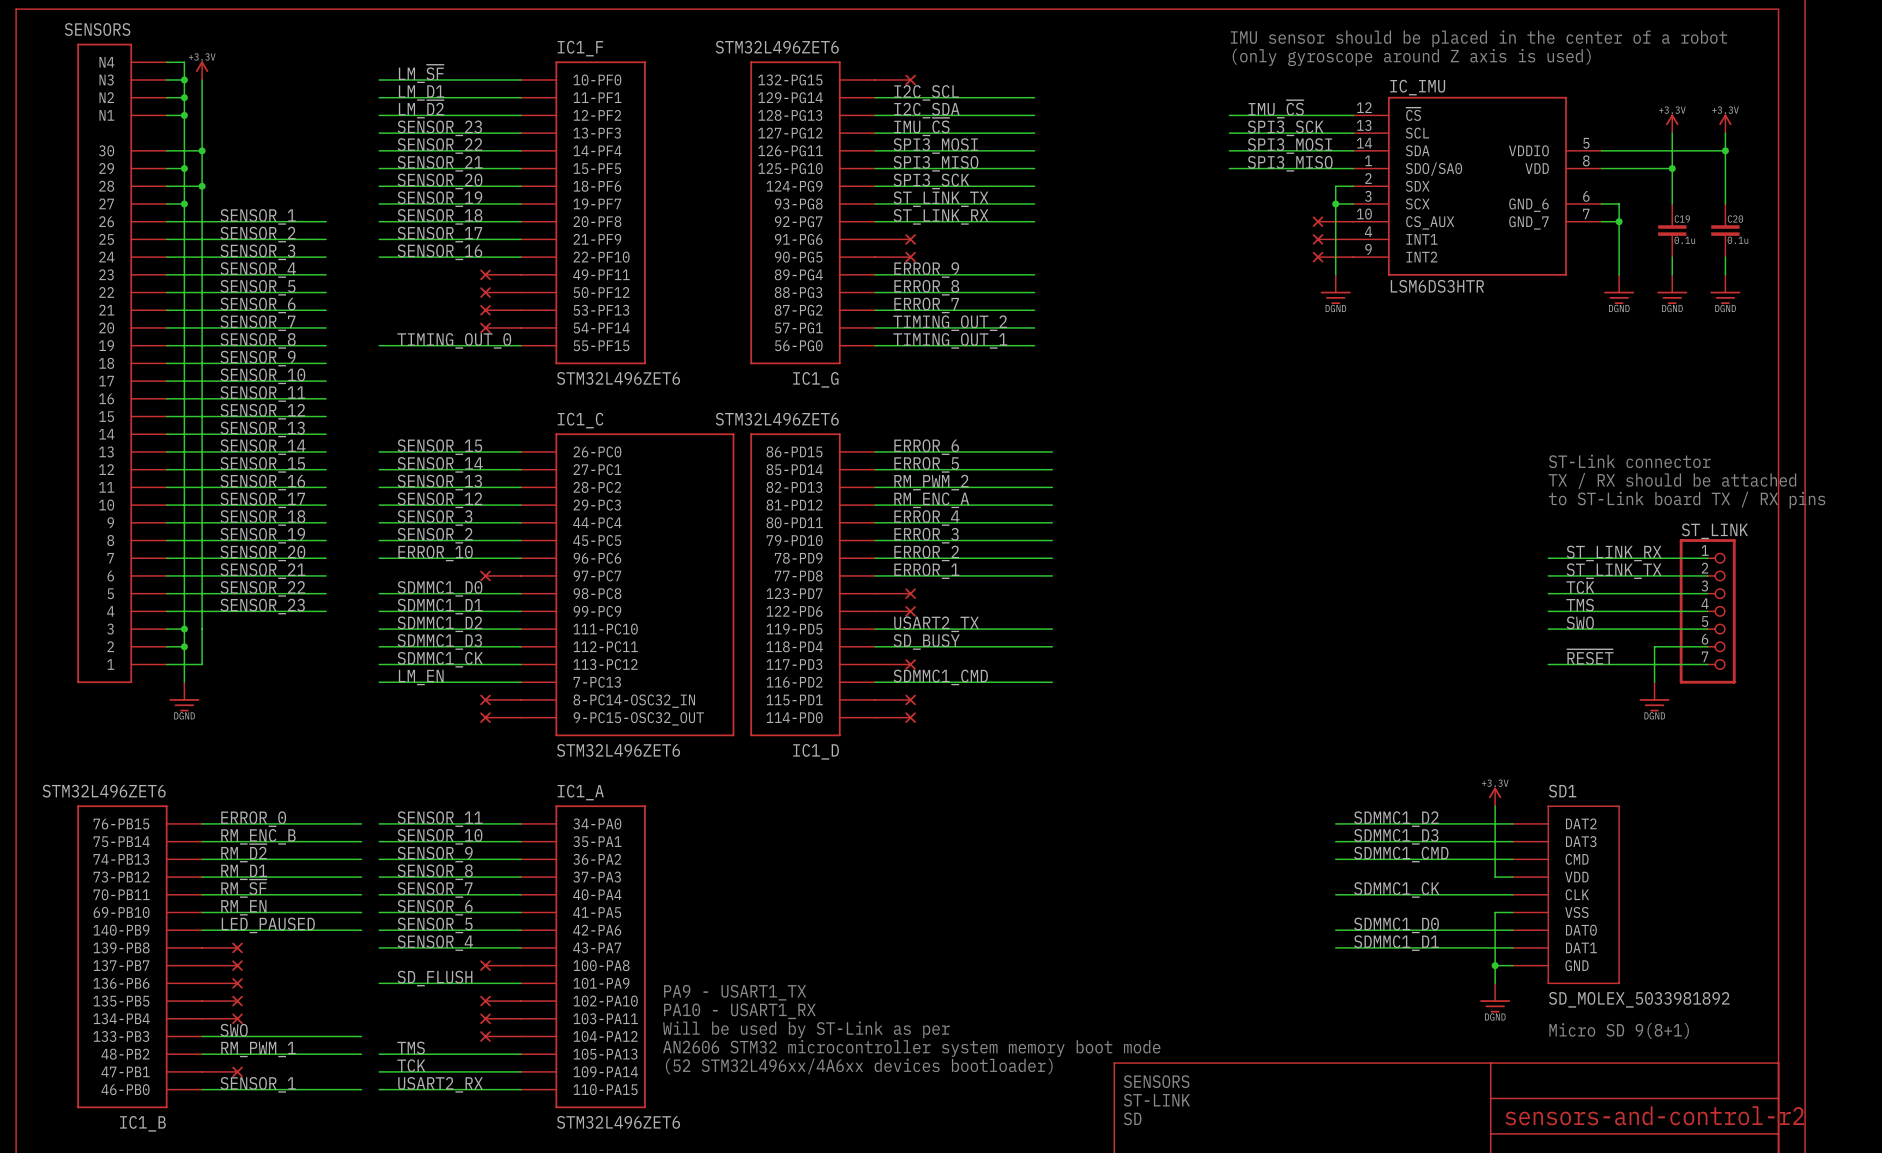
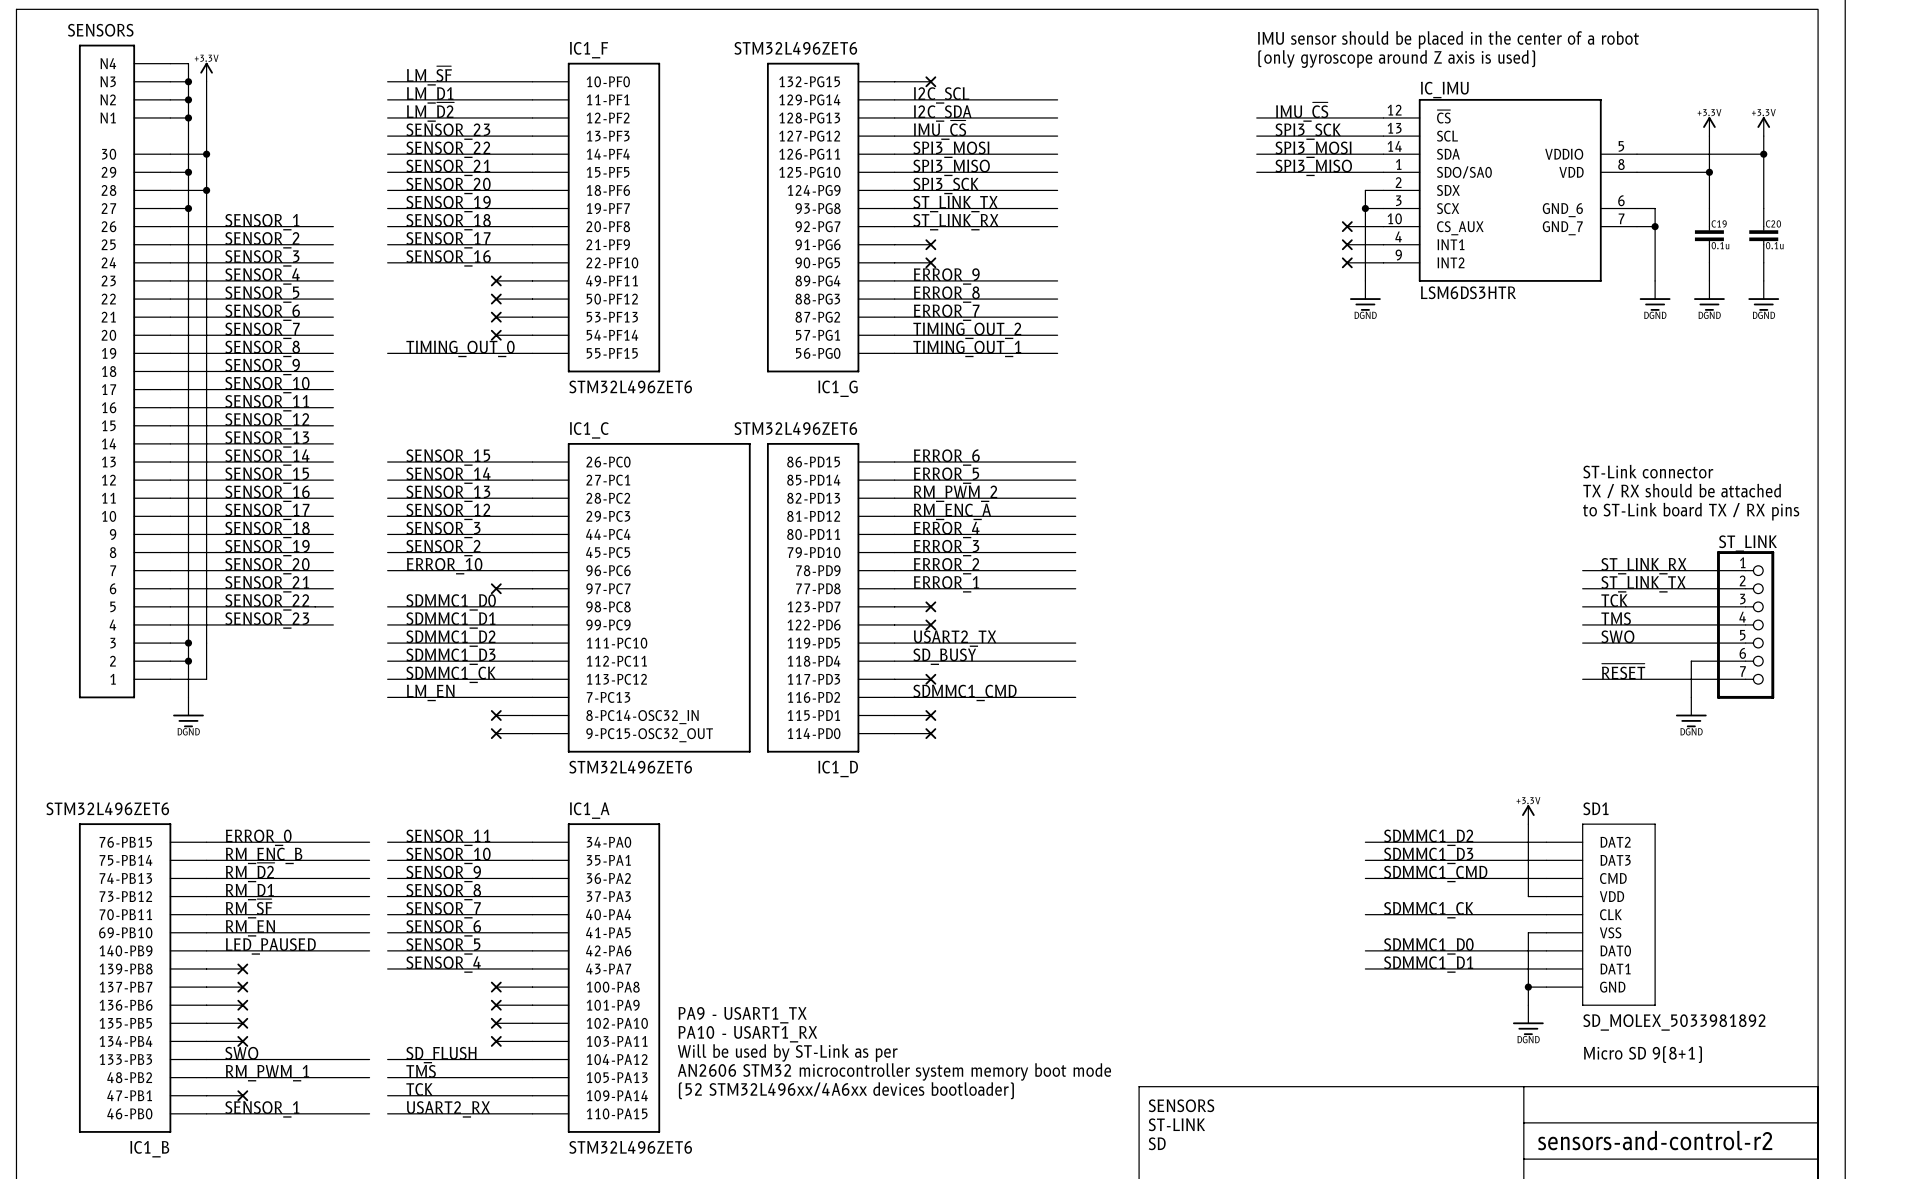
label position: SD_FLUSH (435, 978) -> SD_FLUSH (441, 1055)
wire: (379, 983) (520, 983) -> (387, 1059) (532, 1059)
part position: (500, 1036) -> (511, 1005)

